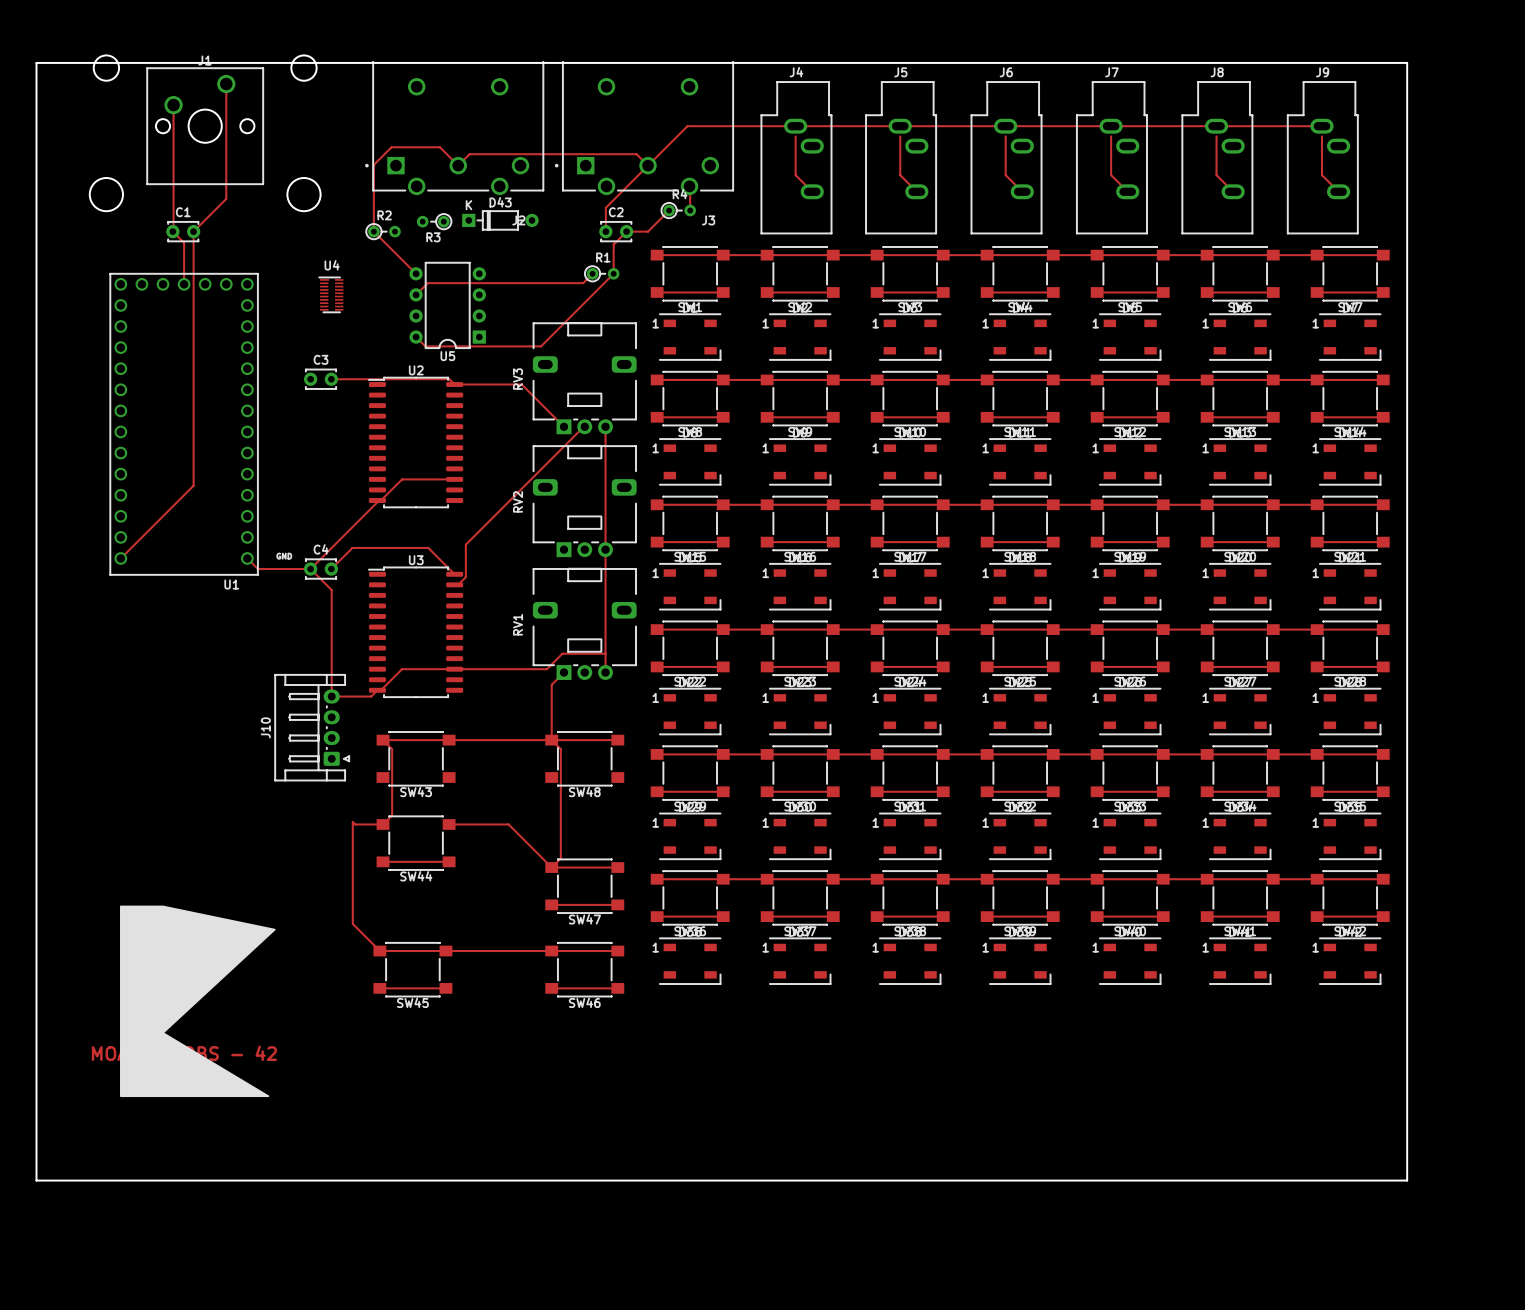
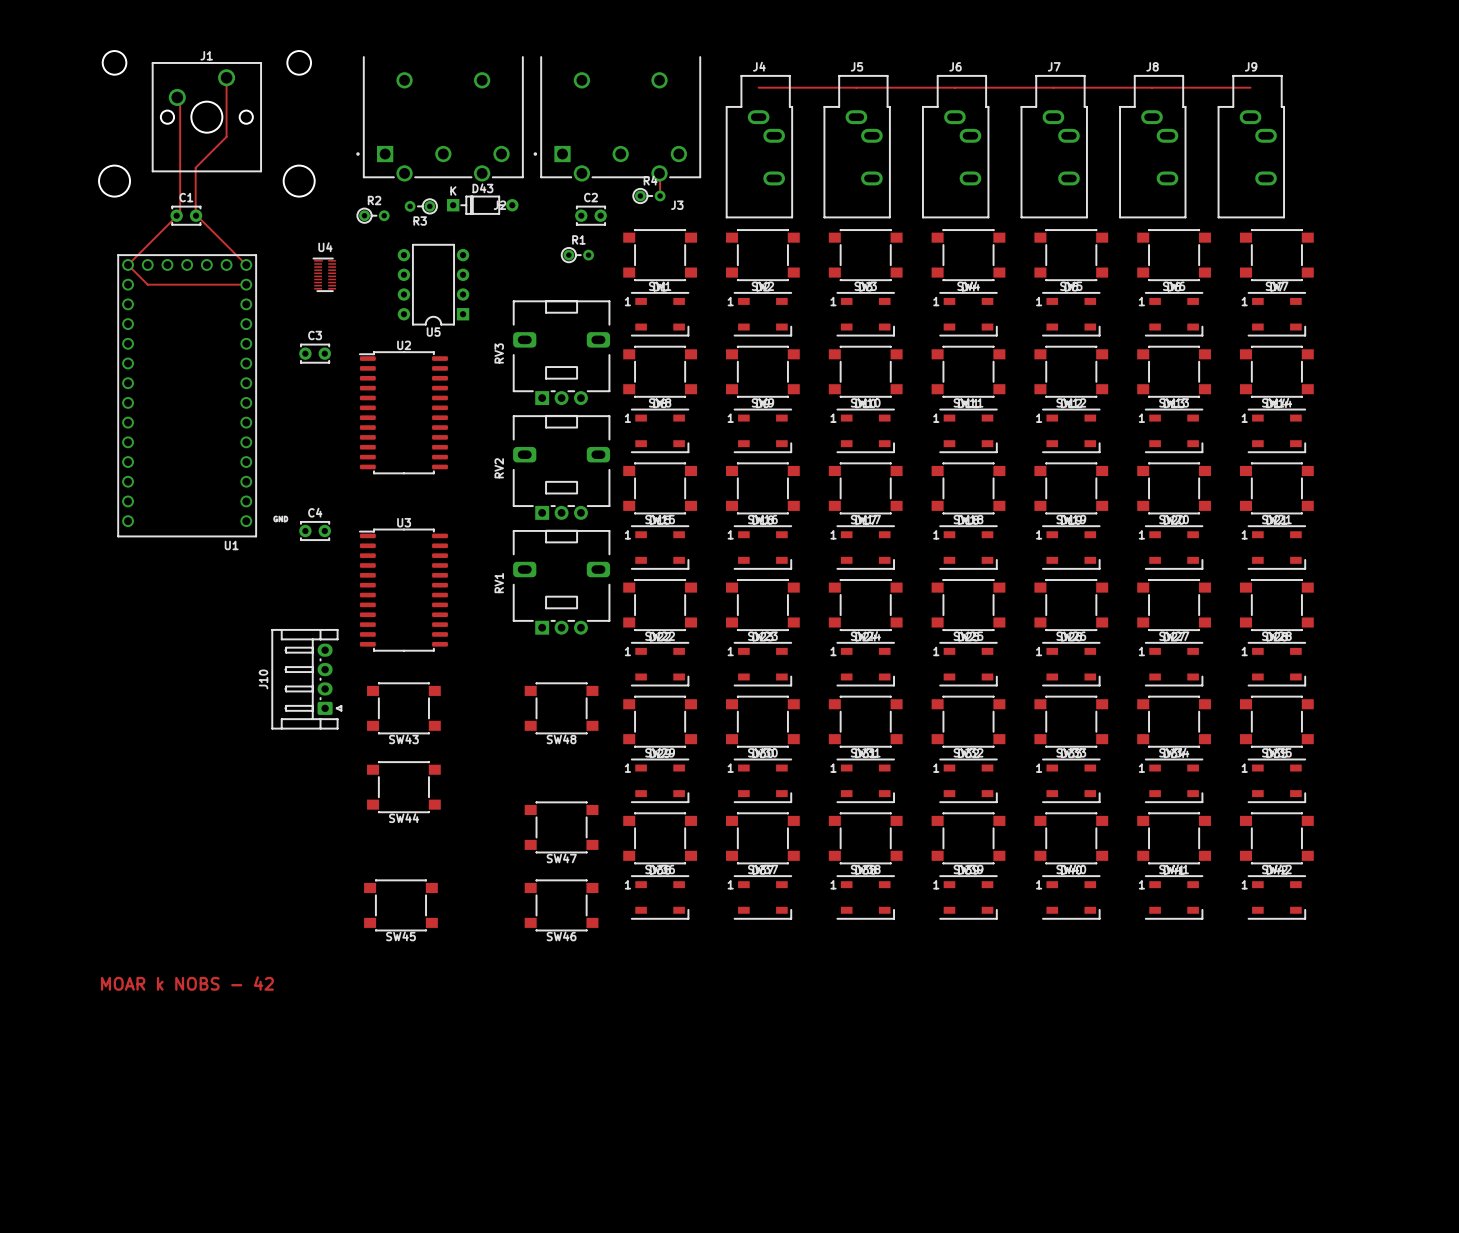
board edge: (36, 62) (1407, 62) (1407, 1180) (36, 1180) (36, 62) -> none
track: none -> (758, 87) (1250, 87)
track: (173, 105) (172, 231) (184, 242) (184, 284) -> none
track: none -> (180, 100) (180, 212) (128, 264) (147, 284) (246, 284)
track: (1321, 126) (687, 126) (605, 207) (605, 231) -> none
track: (795, 136) (795, 175) (812, 191) -> none
track: (900, 136) (900, 175) (916, 191) -> none
track: (1005, 136) (1005, 175) (1022, 191) -> none
track: (1111, 136) (1111, 175) (1127, 191) -> none
track: (1216, 136) (1216, 175) (1233, 191) -> none
track: (1321, 136) (1321, 175) (1338, 191) -> none
track: (226, 147) (226, 198) (193, 231) (193, 485) (120, 558) -> (226, 136) (195, 167) (195, 214) (246, 264)
track: (648, 165) (636, 154) (469, 154) (458, 165) (439, 147) (391, 147) (373, 164) (373, 231) (416, 273) -> none
track: (669, 210) (648, 231) (626, 231) (613, 244) (613, 273) (541, 346) (425, 346) (416, 337) -> none
track: (657, 255) (1269, 255) -> none
track: (1273, 255) (1383, 255) -> none
track: (592, 273) (583, 283) (427, 283) (416, 294) -> none
track: (657, 292) (723, 292) -> none
track: (767, 292) (833, 292) -> none
track: (877, 292) (943, 292) -> none
track: (987, 292) (1053, 292) -> none
track: (1097, 292) (1163, 292) -> none
track: (1207, 292) (1273, 292) -> none
track: (1317, 292) (1383, 292) -> none
track: (331, 379) (449, 379) (454, 384) (521, 384) (564, 426) -> none
track: (657, 379) (1383, 379) -> none
track: (657, 417) (723, 417) -> none
track: (767, 417) (833, 417) (837, 421) -> none
track: (877, 417) (943, 417) -> none
track: (987, 417) (1053, 417) -> none
track: (1097, 417) (1163, 417) -> none
track: (1207, 417) (1273, 417) -> none
track: (1317, 417) (1383, 417) -> none
track: (584, 426) (465, 544) (465, 577) (458, 584) (454, 584) -> none
track: (605, 426) (605, 672) -> none
track: (454, 479) (402, 479) (381, 500) (377, 500) (310, 569) -> none
track: (657, 504) (1383, 504) -> none
track: (657, 542) (723, 542) -> none
track: (767, 542) (833, 542) -> none
track: (877, 542) (943, 542) -> none
track: (987, 542) (1053, 542) -> none
track: (1097, 542) (1163, 542) -> none
track: (1207, 542) (1273, 542) -> none
track: (1317, 542) (1383, 542) -> none
track: (247, 558) (257, 569) (310, 569) -> none
track: (310, 569) (331, 590) (331, 696) (371, 696) (377, 690) (381, 690) (402, 669) (546, 669) (562, 653) (605, 653) -> none
track: (331, 569) (352, 547) (428, 547) (454, 574) -> none
track: (657, 629) (1383, 629) -> none
track: (657, 666) (723, 666) -> none
track: (767, 666) (833, 666) -> none
track: (877, 666) (943, 666) -> none
track: (987, 666) (1053, 666) -> none
track: (1097, 666) (1163, 666) -> none
track: (1207, 666) (1273, 666) -> none
track: (1317, 666) (1383, 666) -> none
track: (564, 672) (551, 684) (551, 740) (560, 749) (560, 858) (551, 867) -> none
track: (617, 740) (383, 740) (392, 749) (392, 815) (383, 824) (355, 824) (352, 822) (352, 923) (379, 951) (617, 951) -> none
track: (657, 754) (1383, 754) -> none
track: (657, 791) (723, 791) -> none
track: (767, 791) (833, 791) -> none
track: (877, 791) (943, 791) -> none
track: (987, 791) (1053, 791) -> none
track: (1097, 791) (1163, 791) -> none
track: (1207, 791) (1273, 791) -> none
track: (1317, 791) (1383, 791) -> none
track: (449, 824) (508, 824) (551, 867) -> none
track: (383, 861) (449, 861) -> none
track: (551, 867) (617, 867) -> none
track: (657, 879) (1383, 879) -> none
track: (551, 904) (617, 904) -> none
drawing: [120, 905, 276, 1098] -> none
track: (657, 916) (723, 916) -> none
track: (767, 916) (833, 916) -> none
track: (877, 916) (943, 916) -> none
track: (987, 916) (1053, 916) -> none
track: (1097, 916) (1163, 916) -> none
track: (1207, 916) (1273, 916) -> none
track: (1317, 916) (1383, 916) -> none
track: (379, 988) (445, 988) -> none
track: (551, 988) (617, 988) -> none

